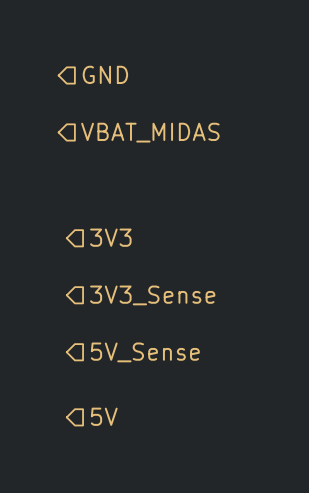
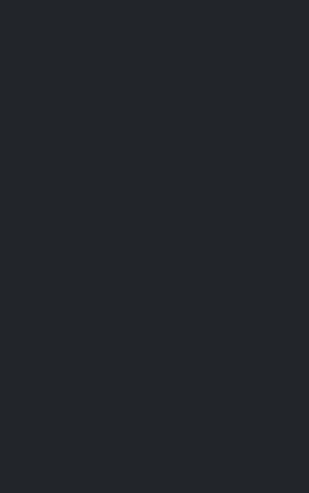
hierarchical label: GND (105, 74) -> none
hierarchical label: VBAT_MIDAS (150, 132) -> none
hierarchical label: 3V3 (110, 237) -> none
hierarchical label: 3V3_Sense (152, 295) -> none
hierarchical label: 5V_Sense (145, 352) -> none
hierarchical label: 5V (104, 416) -> none

